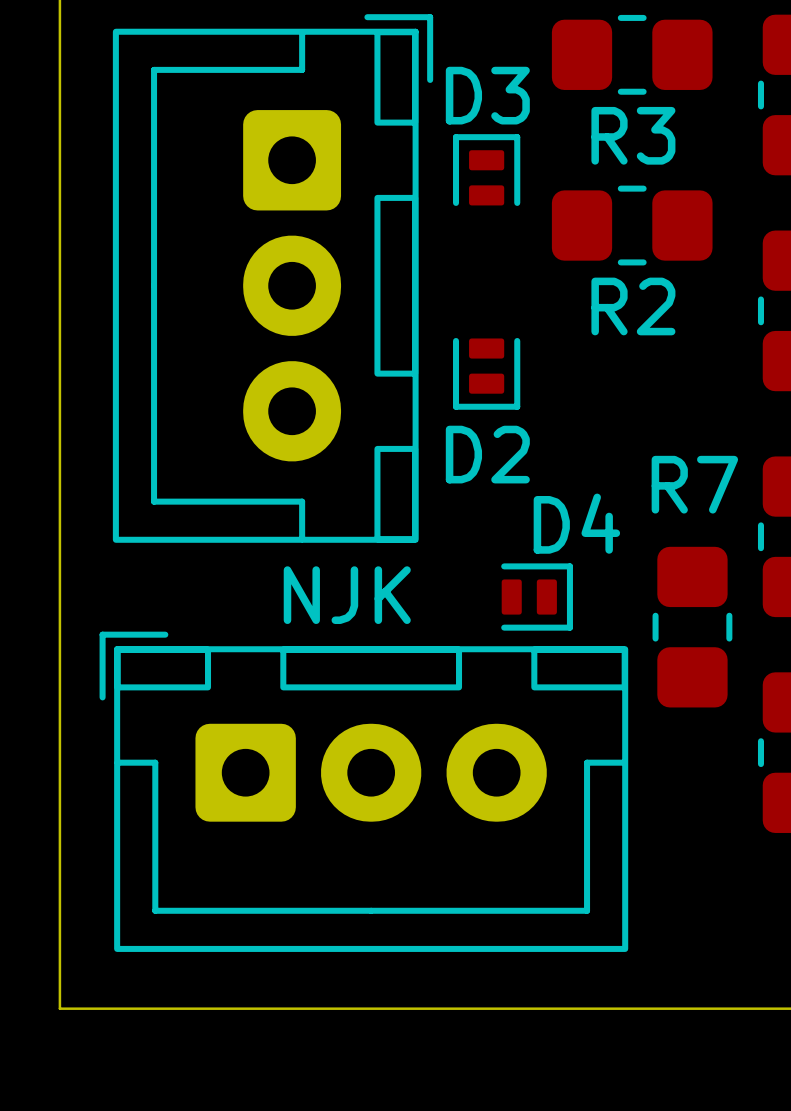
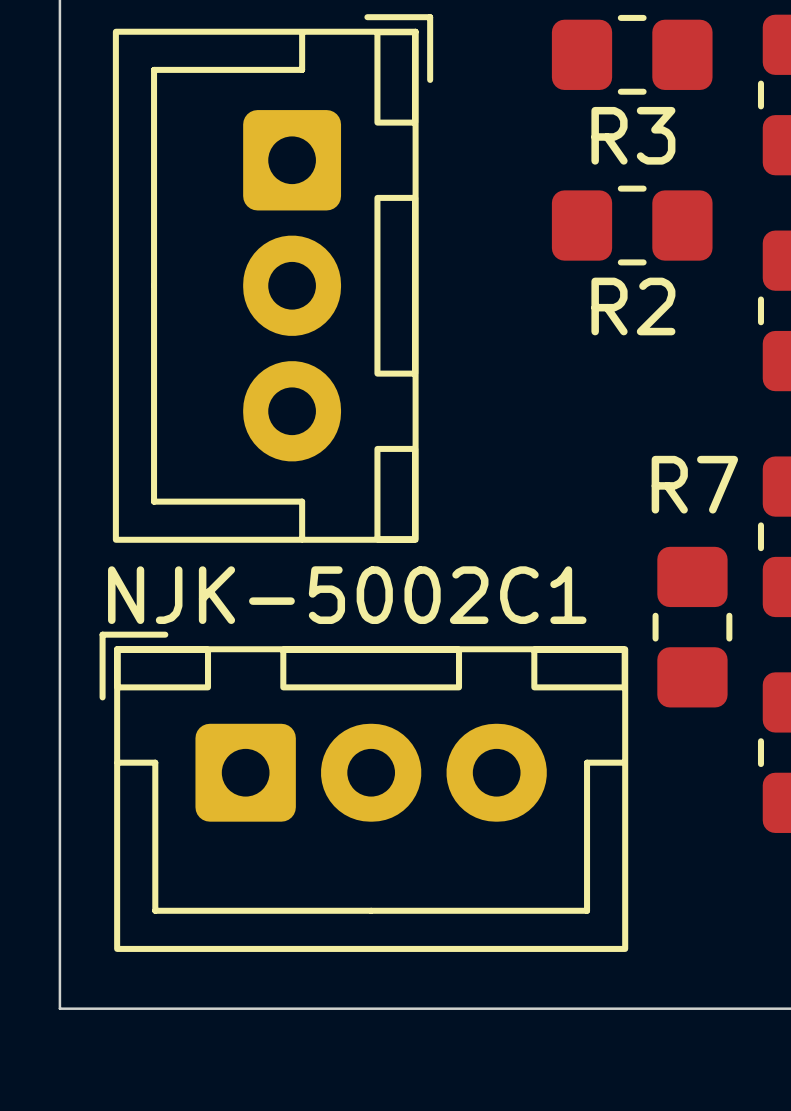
D3: (486, 170) -> none
D2: (486, 373) -> none
NJK name: NJK (347, 595) -> NJK-5002C1 (347, 595)
D4: (537, 597) -> none

